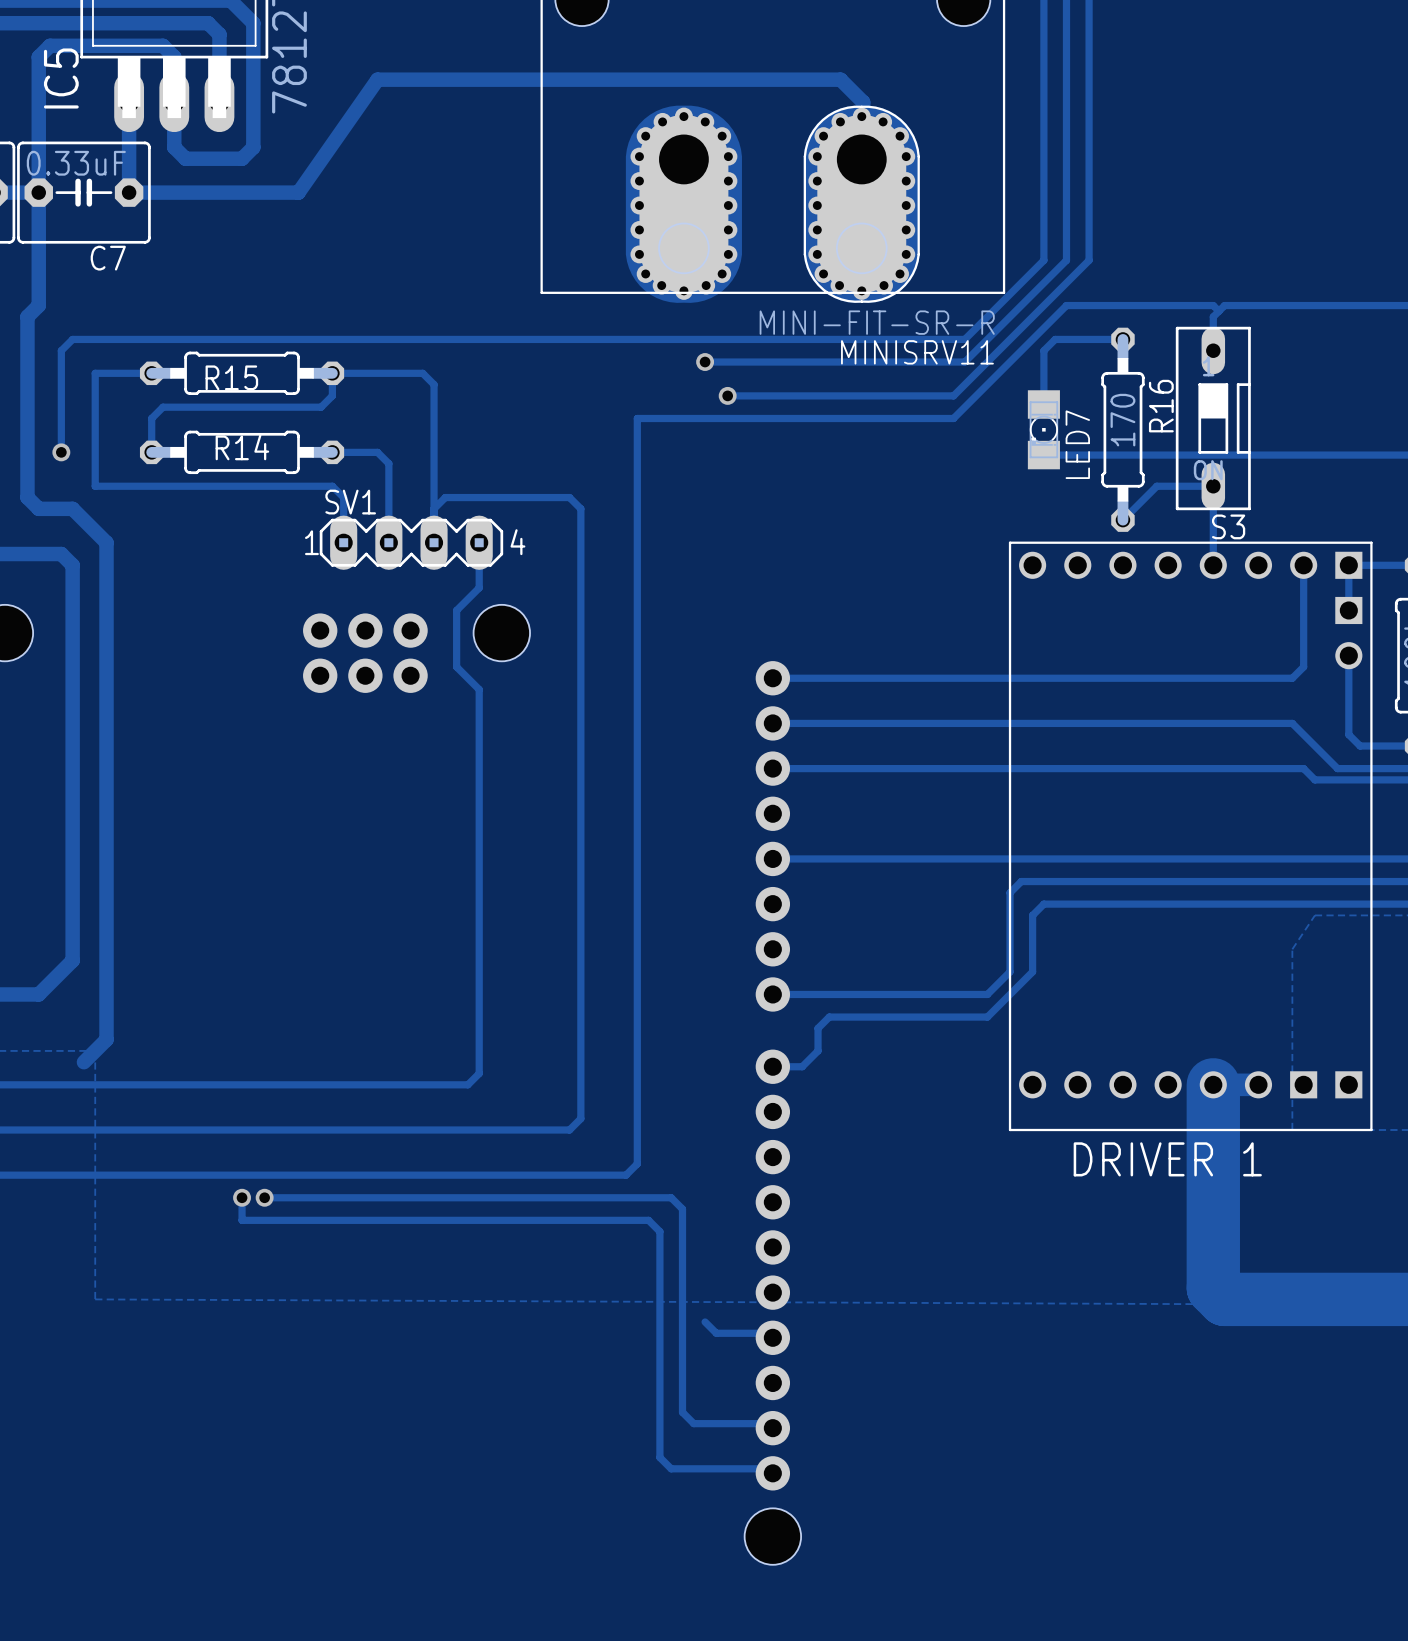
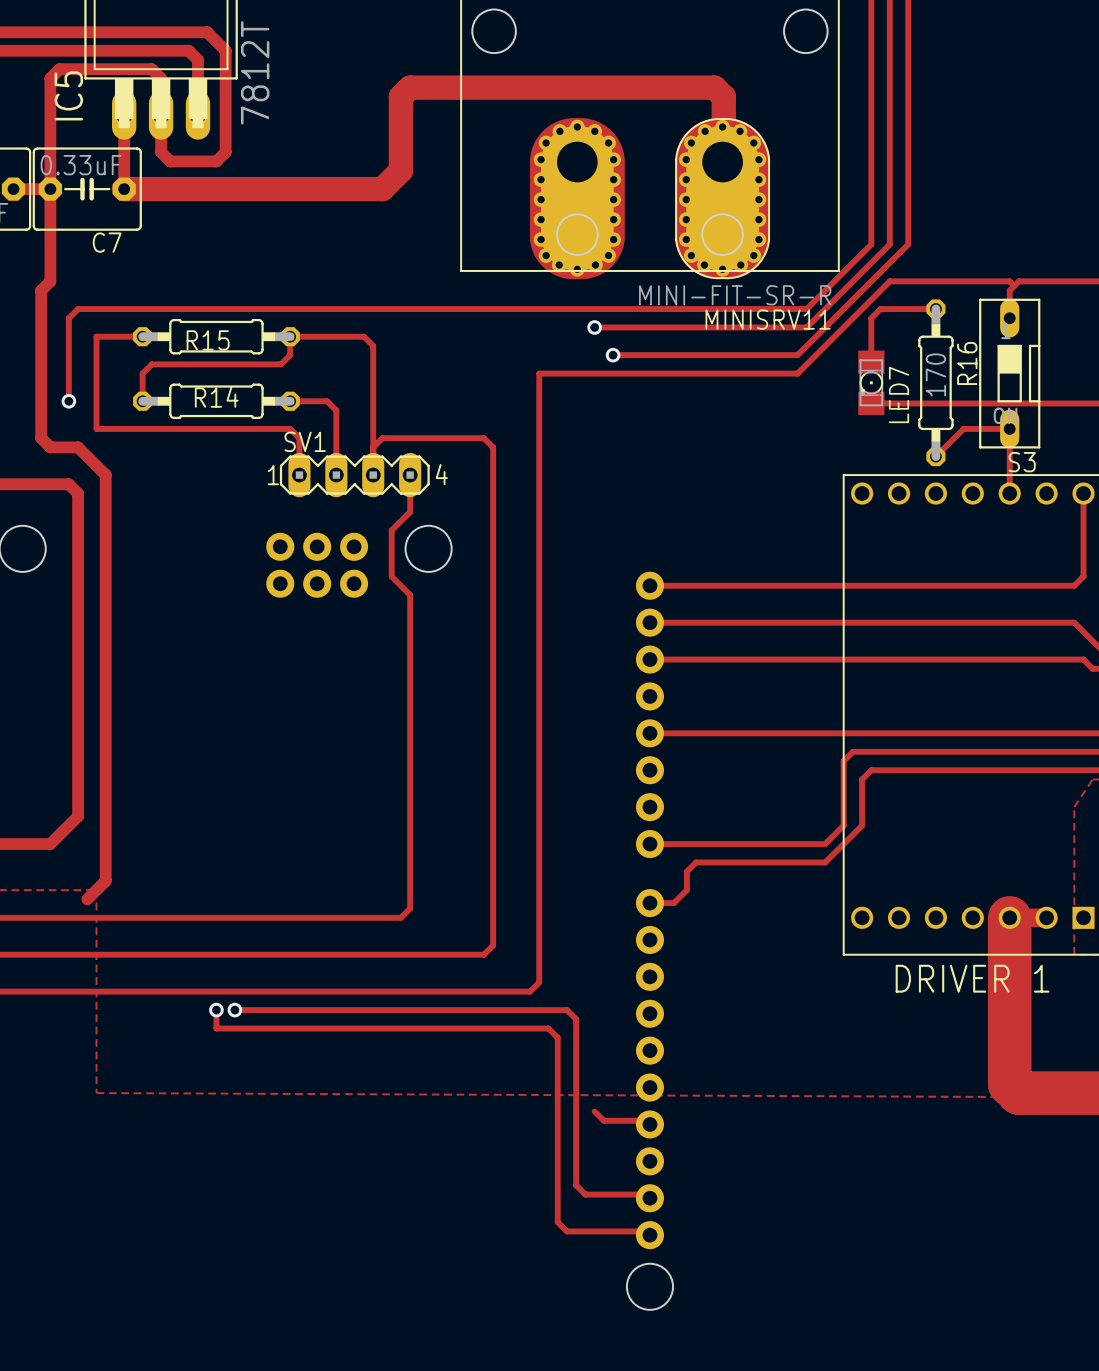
track: (863, 102) (840, 79) (377, 79) (298, 192) -> (723, 115) (723, 96) (714, 87) (410, 87) (400, 96) (400, 170) (382, 189) (262, 189)
track width: thin (129, 192) (298, 192) -> thick (124, 189) (262, 189)

